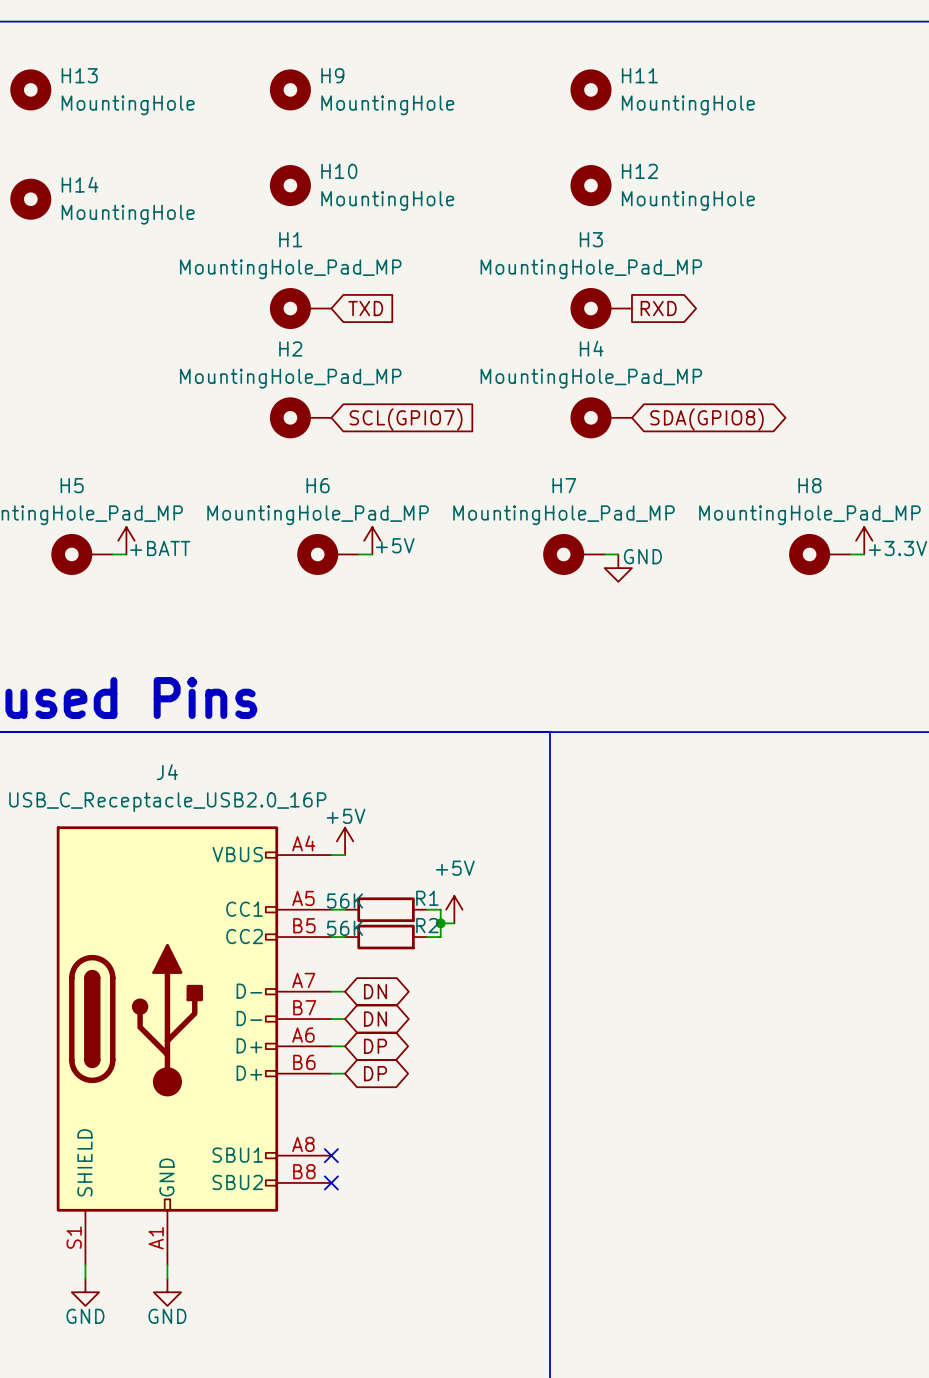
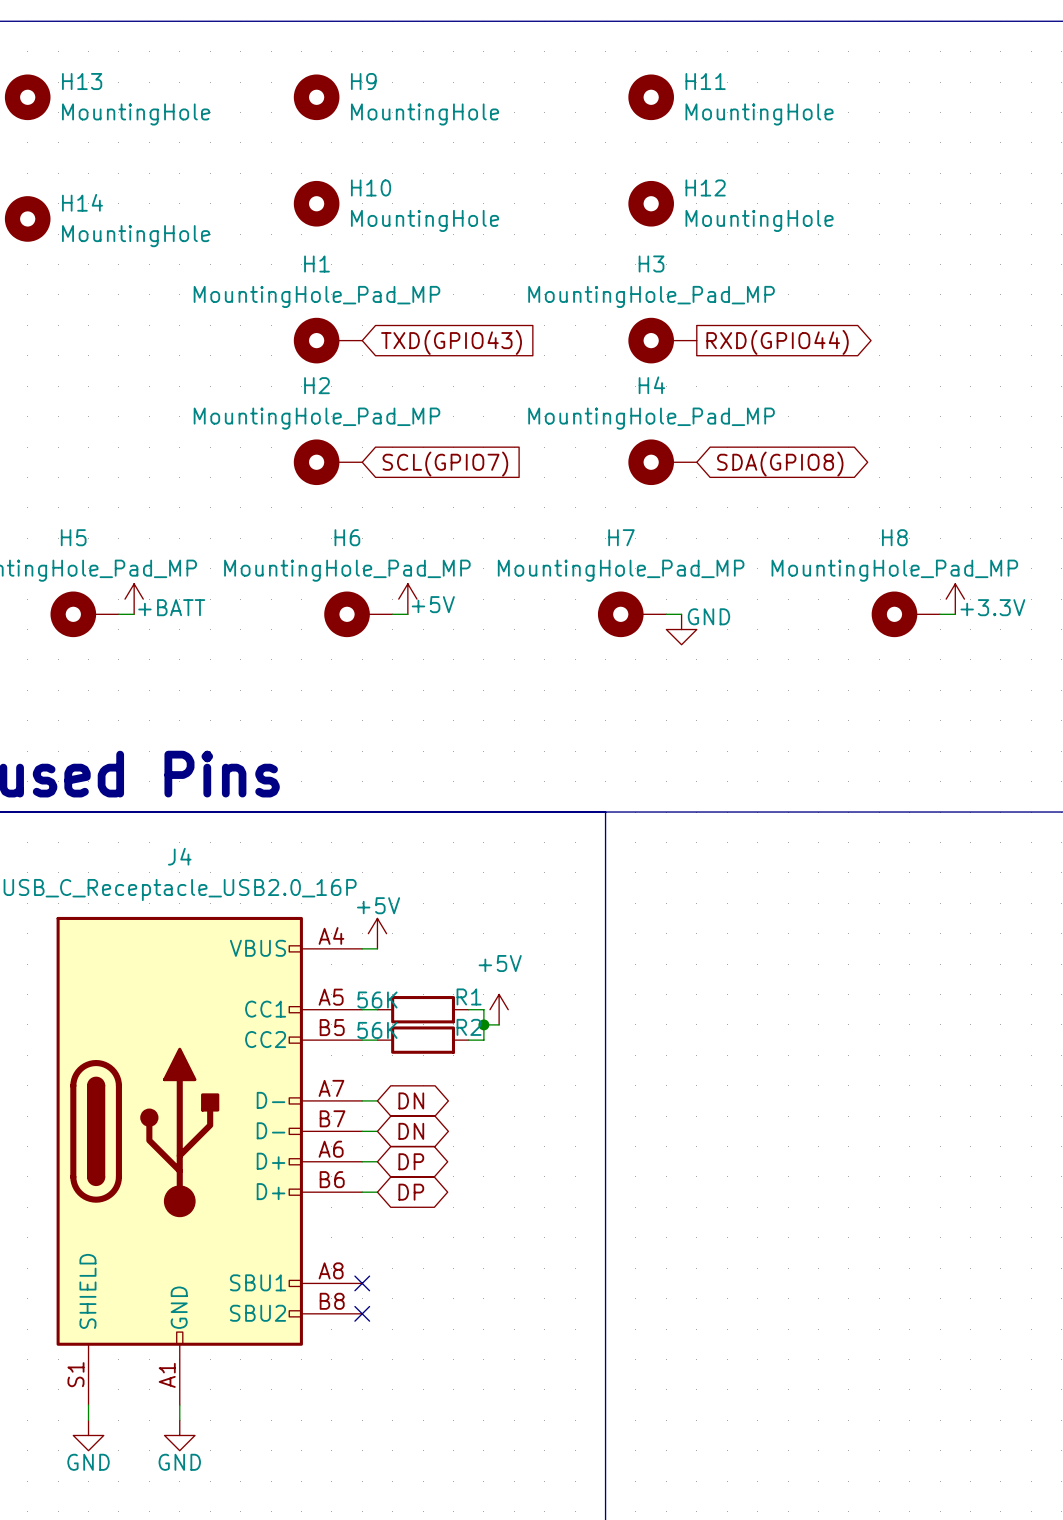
global label: TXD (365, 308) -> TXD(GPIO43) (451, 342)
global label: RXD (658, 308) -> RXD(GPIO44) (777, 342)

